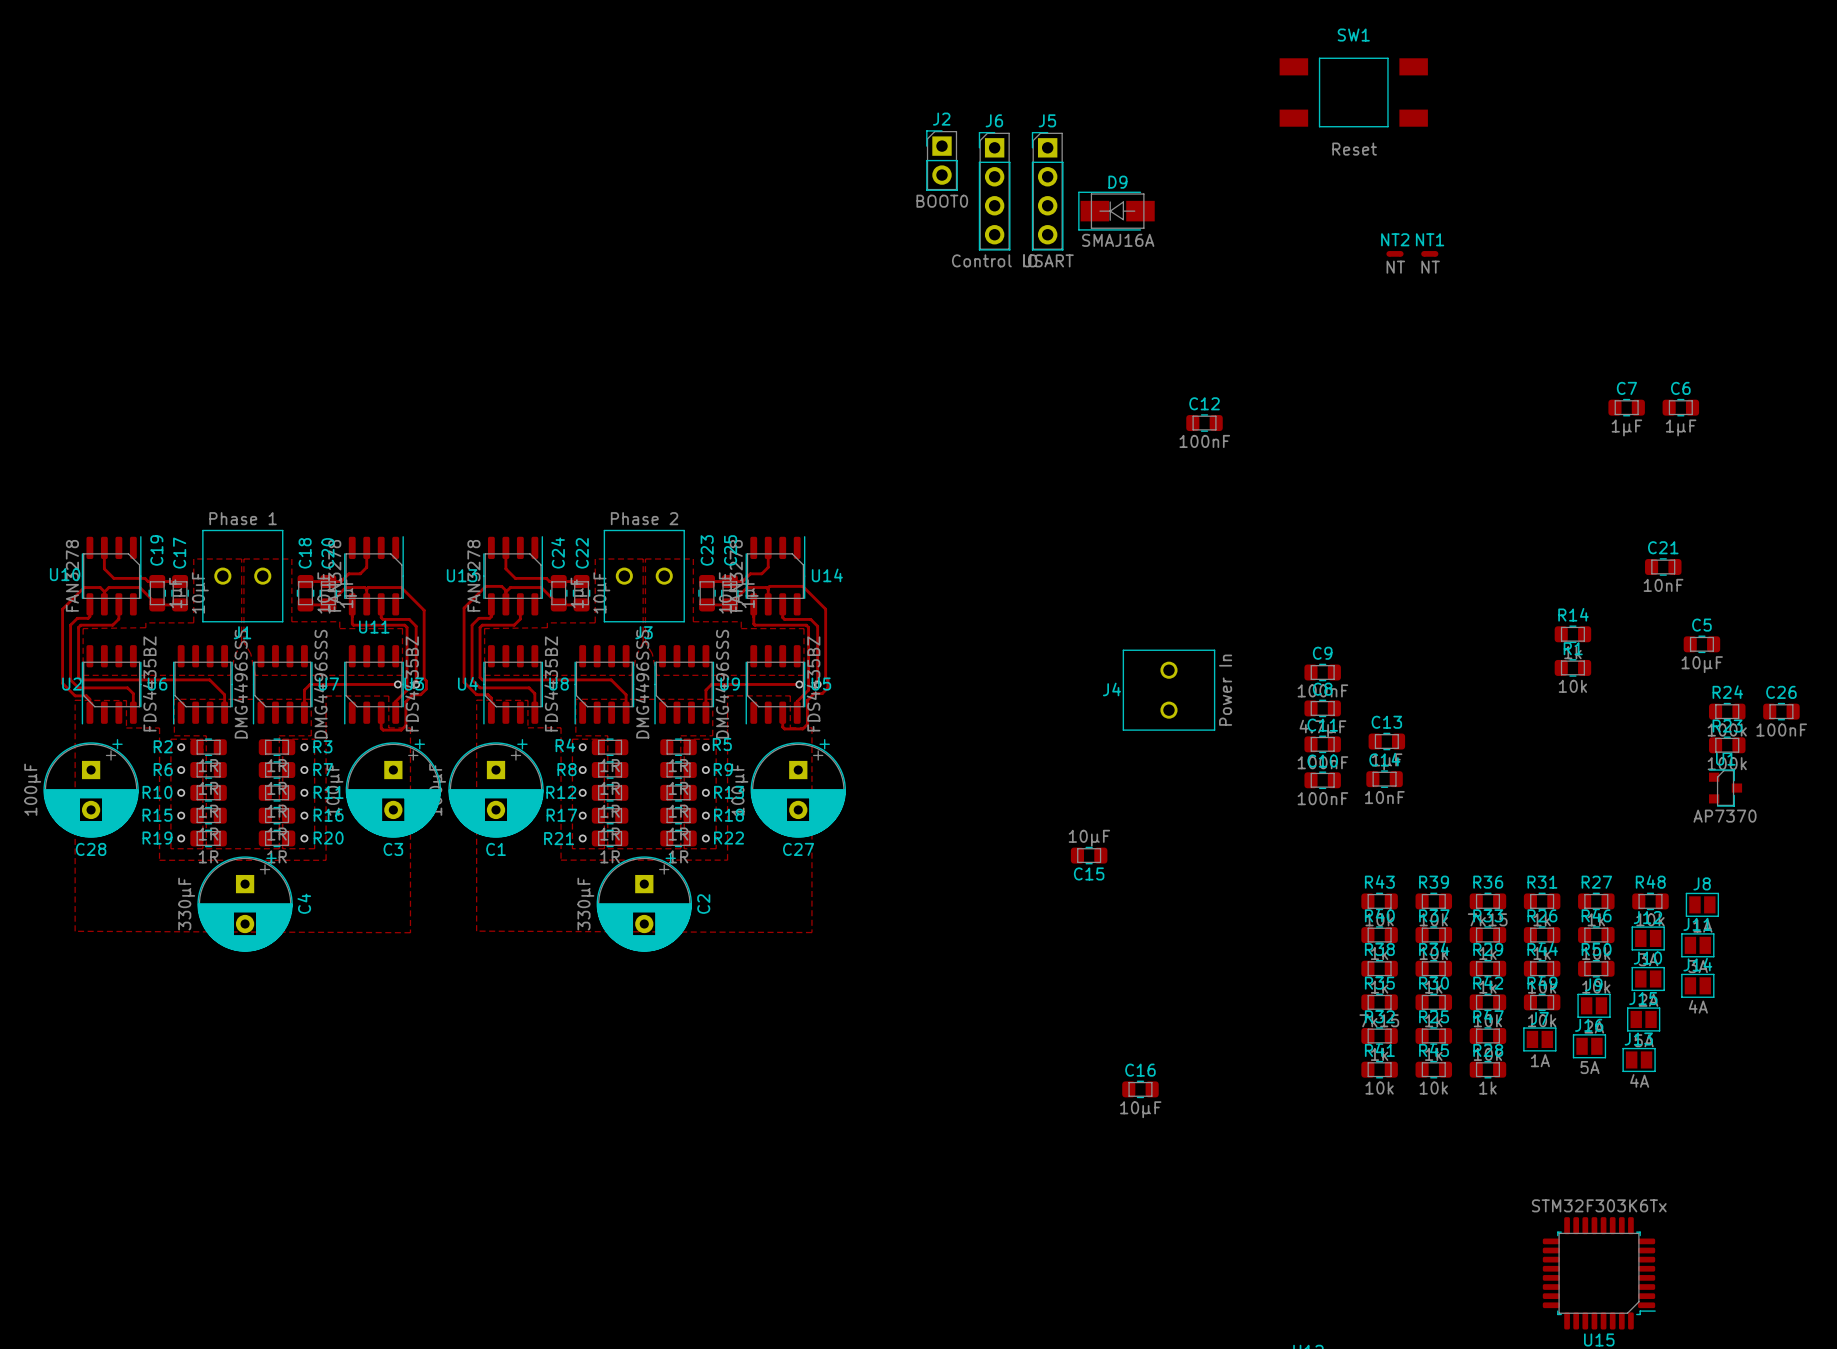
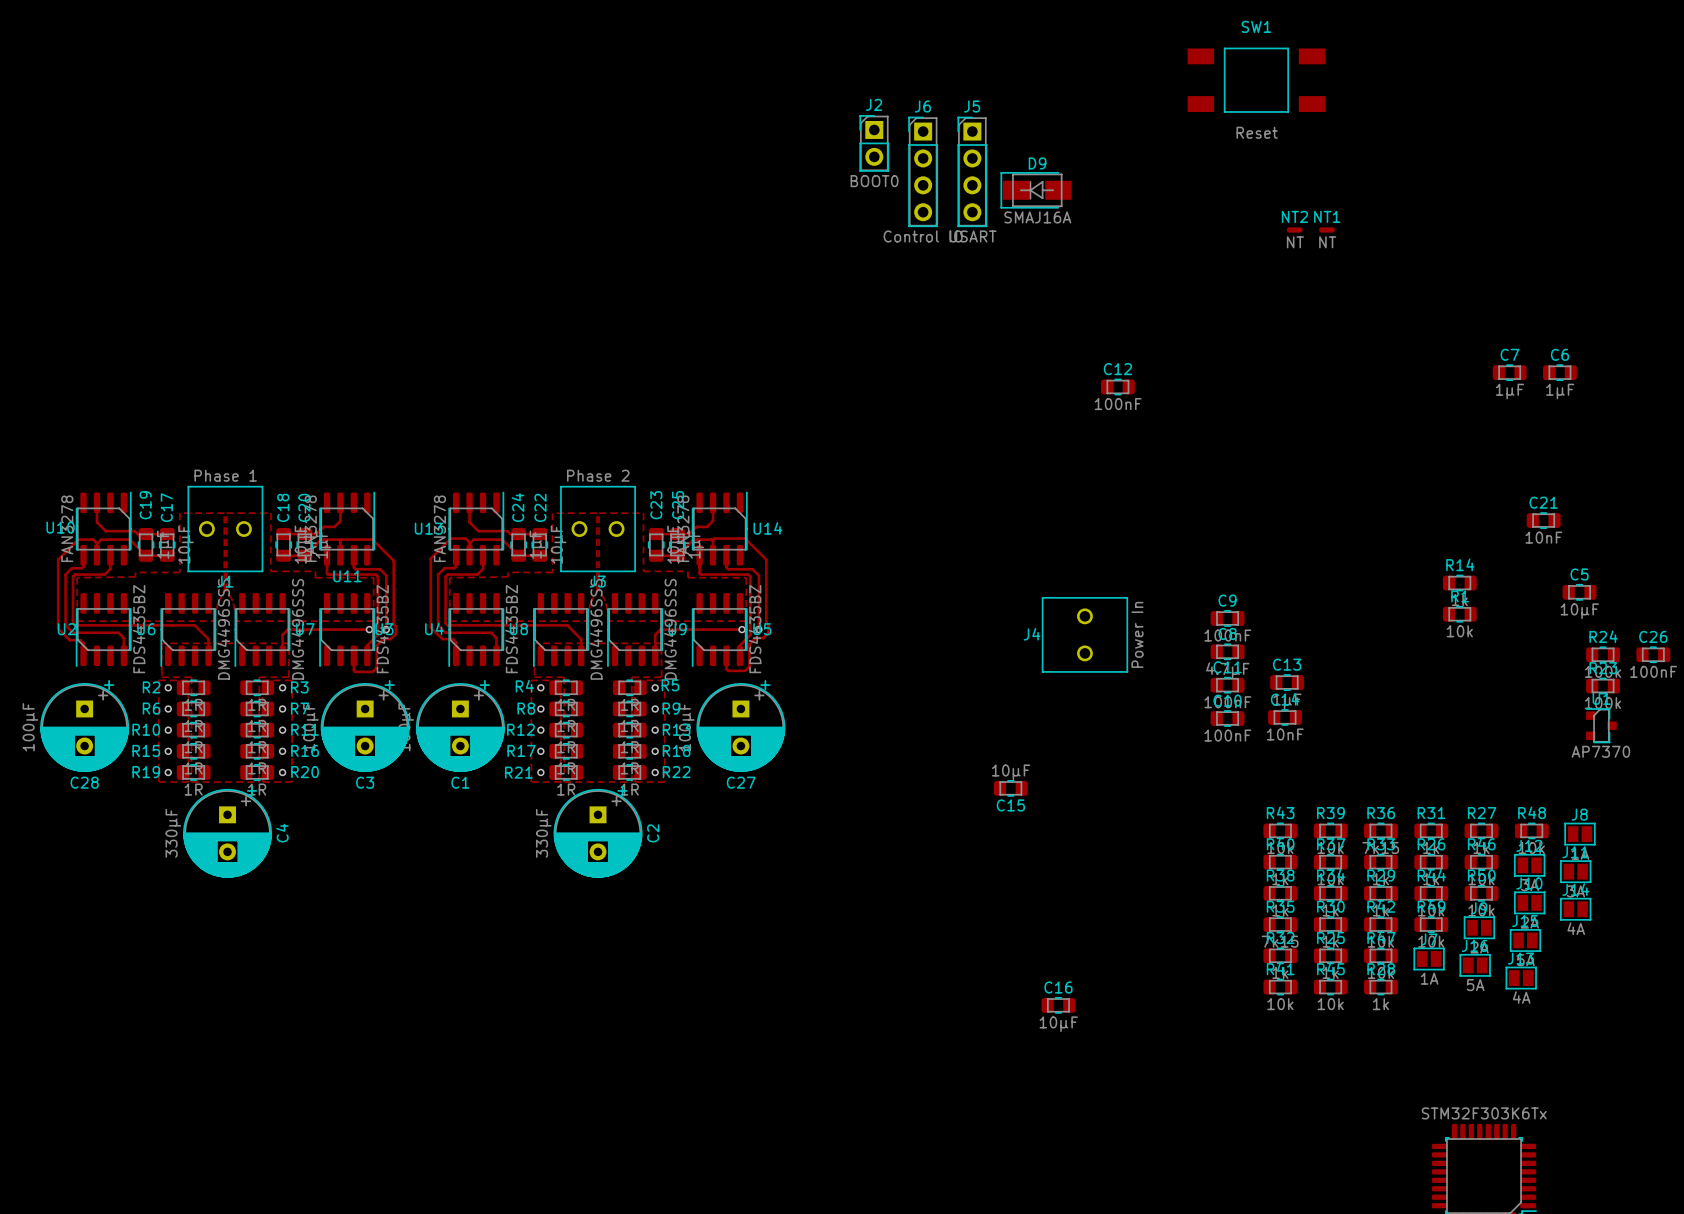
zone outline: (727, 695) (727, 860) (561, 860) (561, 727) (527, 727) (527, 700) (476, 700) (476, 931) (811, 932) (811, 727) (790, 727) (790, 695) (727, 695) -> none
zone outline: (326, 696) (326, 860) (159, 860) (159, 727) (126, 727) (126, 700) (75, 700) (75, 931) (410, 932) (410, 727) (388, 727) (388, 696) (326, 696) -> none

